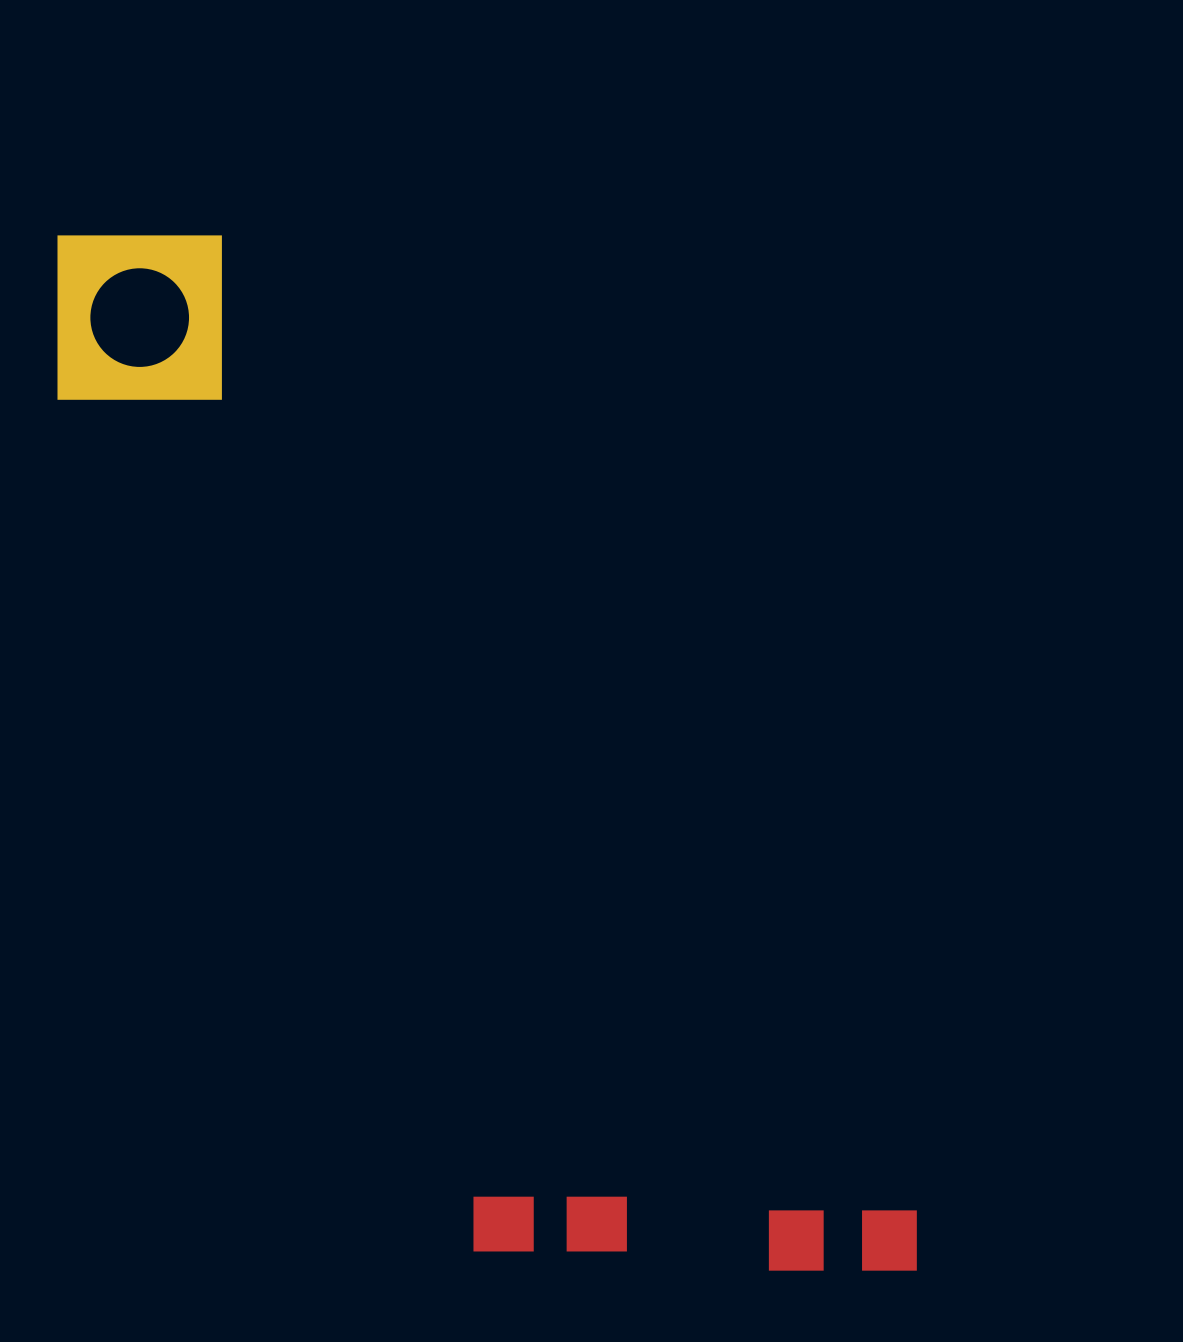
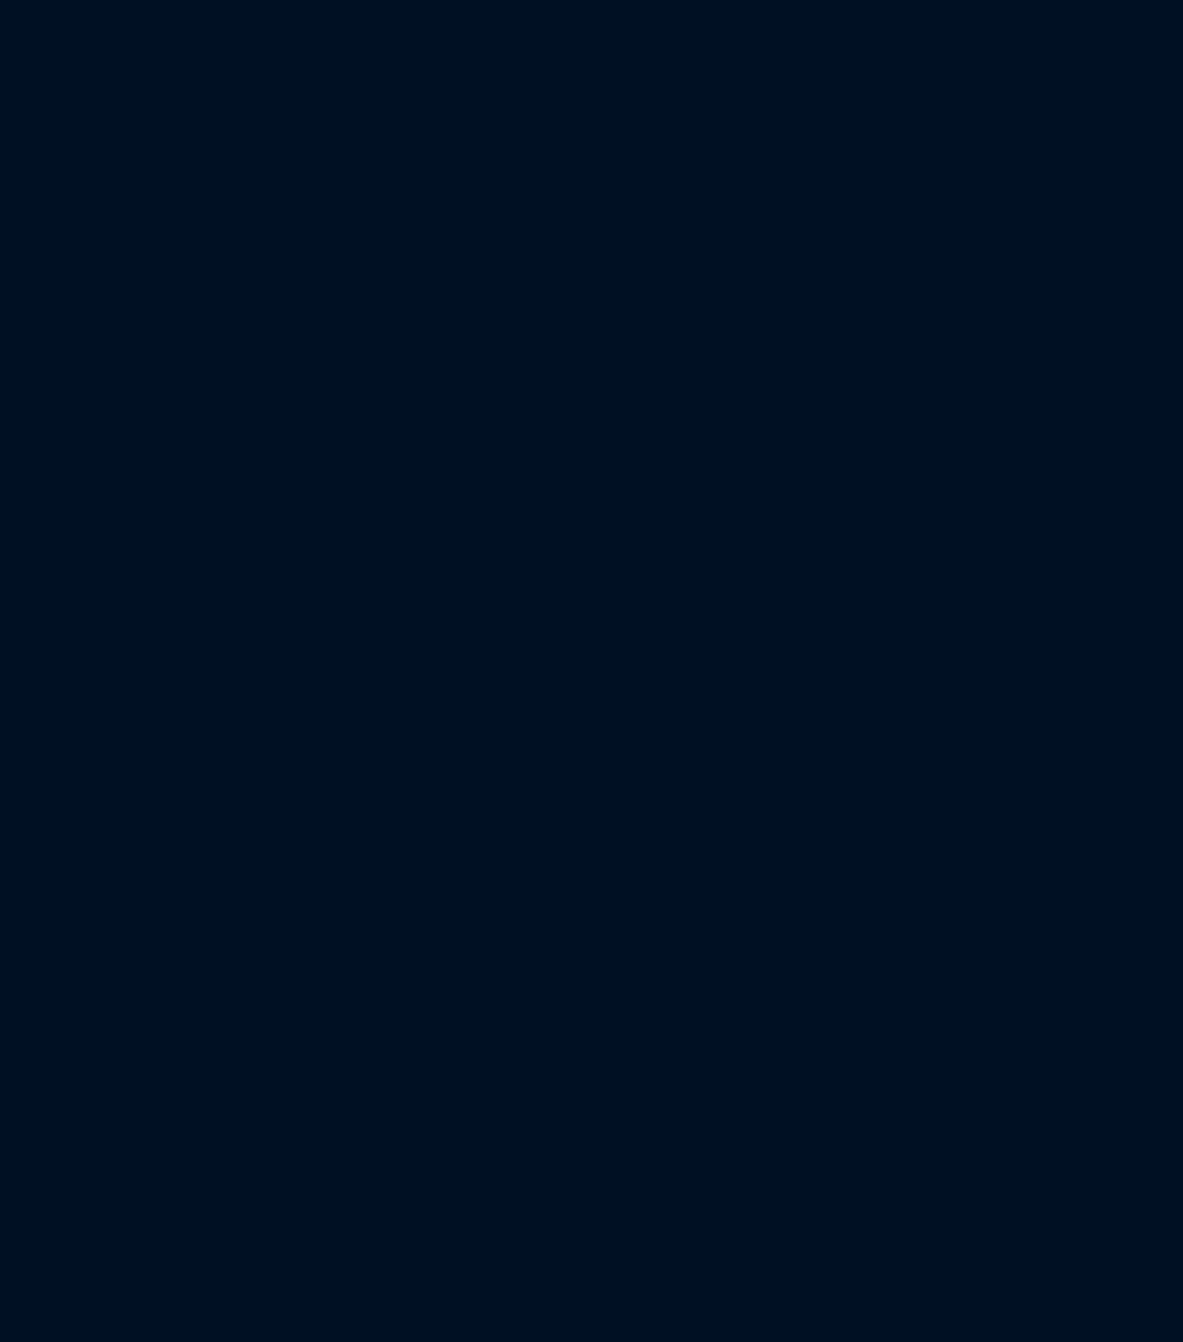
part: (139, 317) -> none
part: (550, 1224) -> none
part: (842, 1240) -> none

